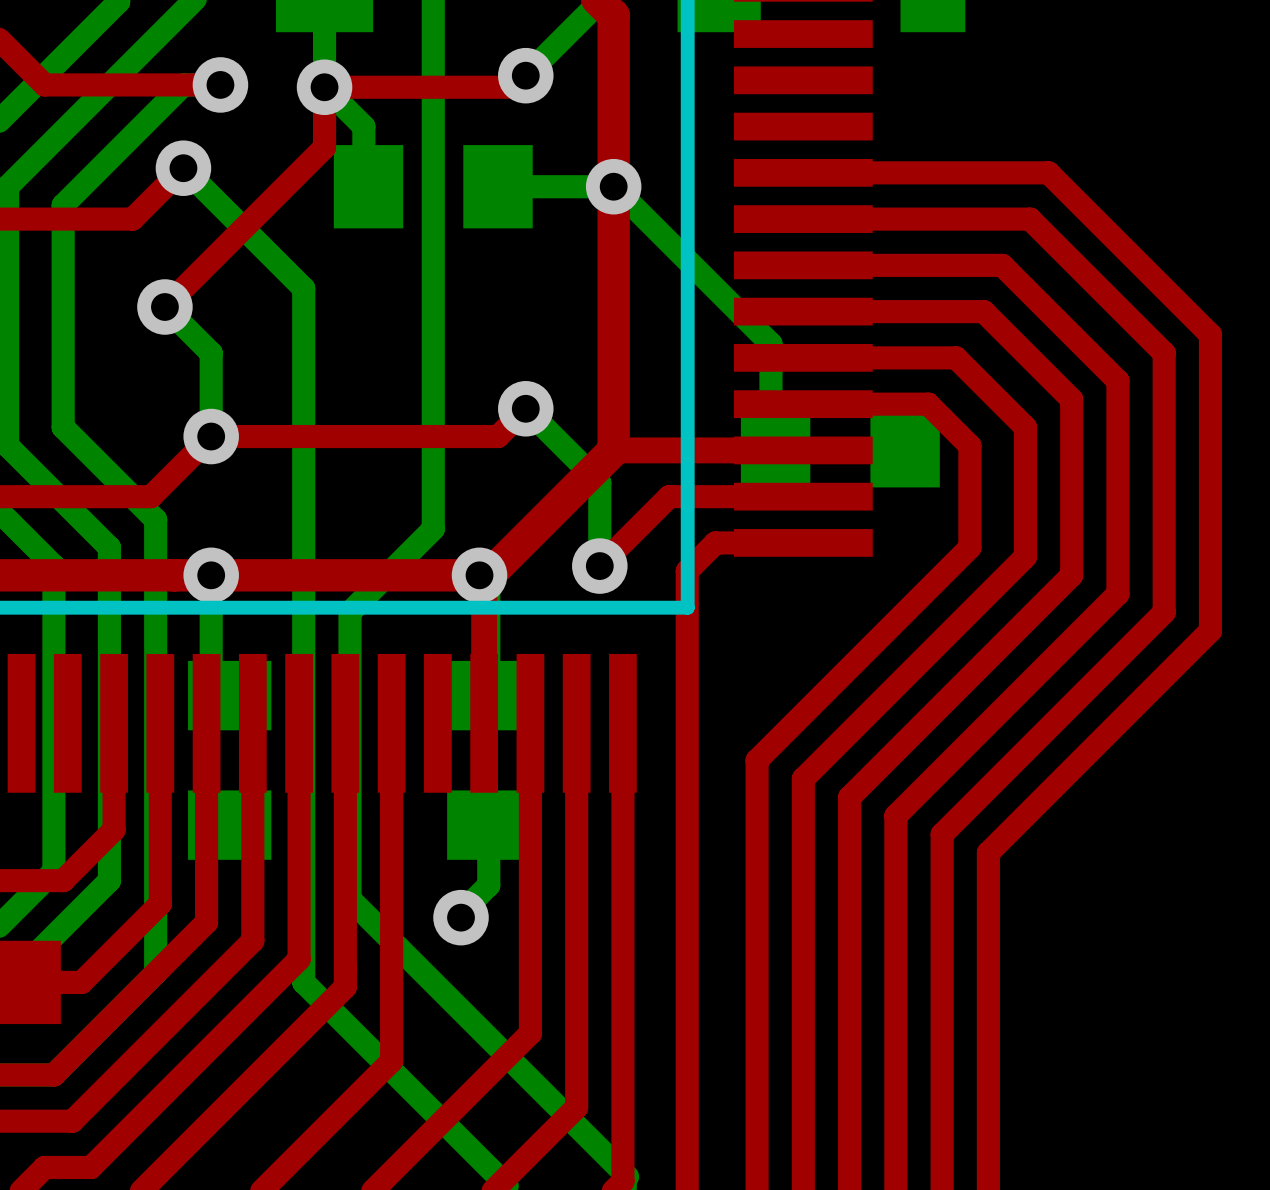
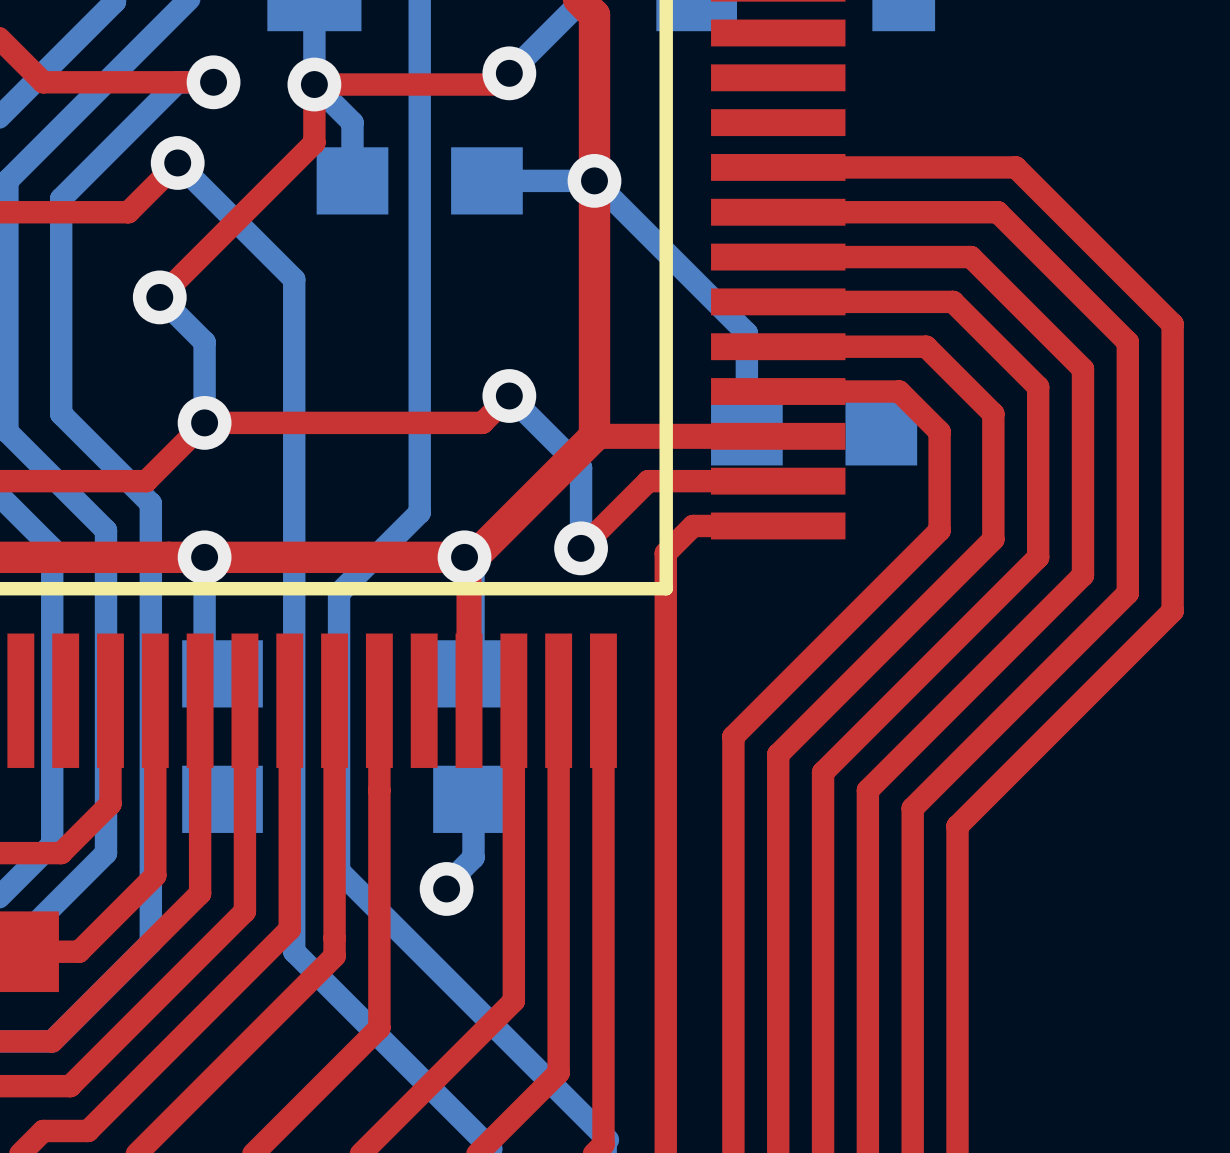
part footprint: [333, 145, 533, 229] -> [316, 147, 523, 215]
part footprint: [740, 404, 940, 488] -> [711, 398, 918, 466]

